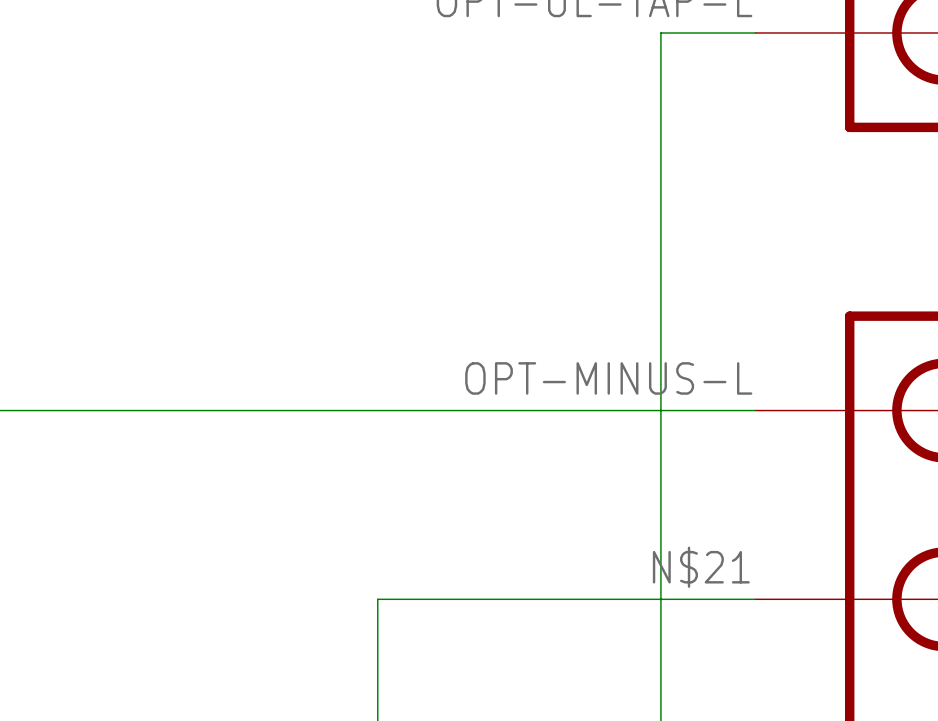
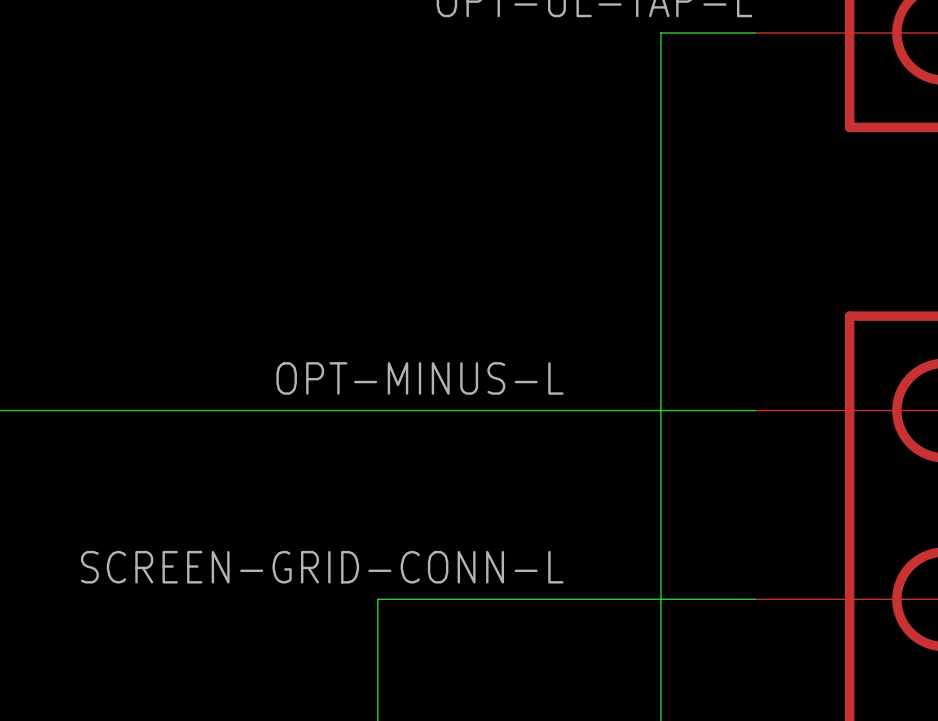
label position: OPT-MINUS-L (608, 378) -> OPT-MINUS-L (419, 378)
label: none -> SCREEN-GRID-CONN-L (322, 567)
label: N$21 (701, 567) -> none

